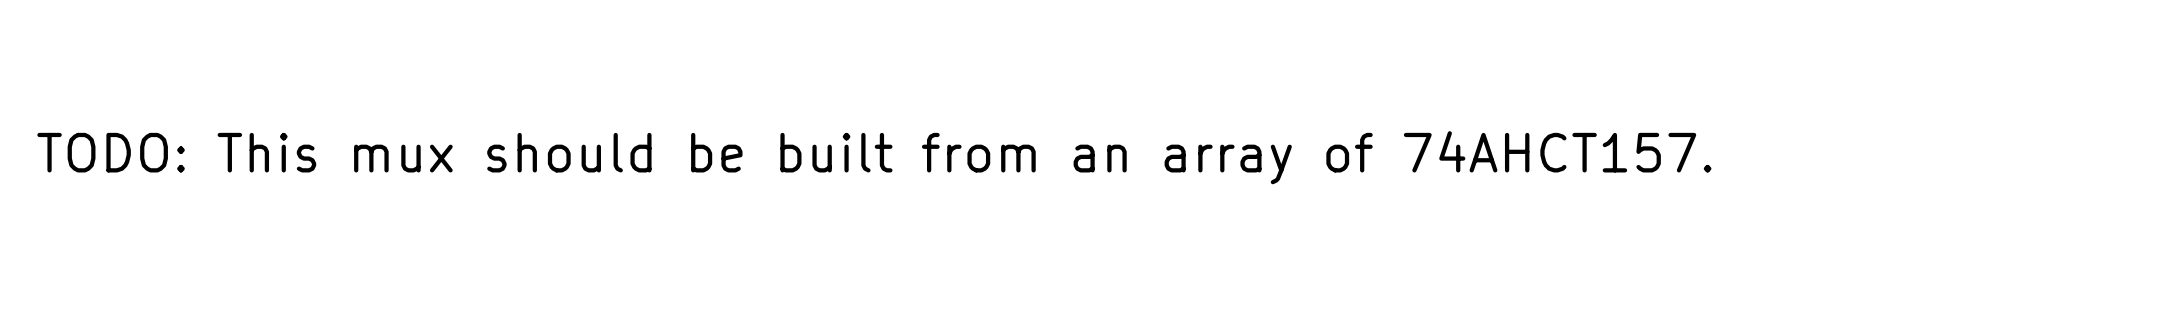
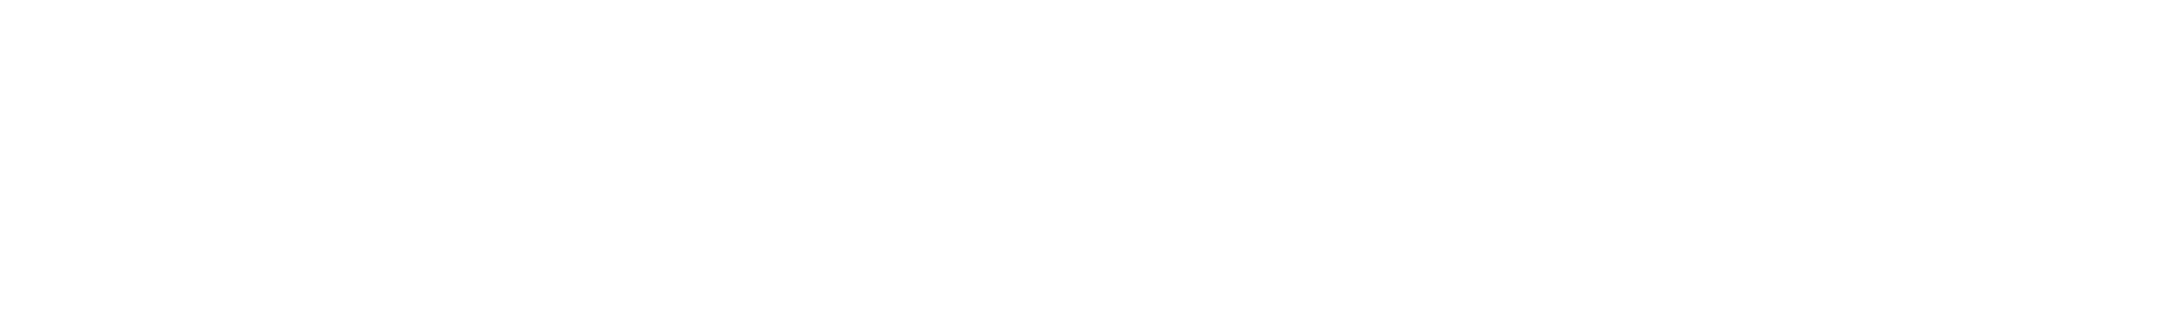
text: TODO: This mux should be built from an array of 74AHCT157. (874, 157) -> none

